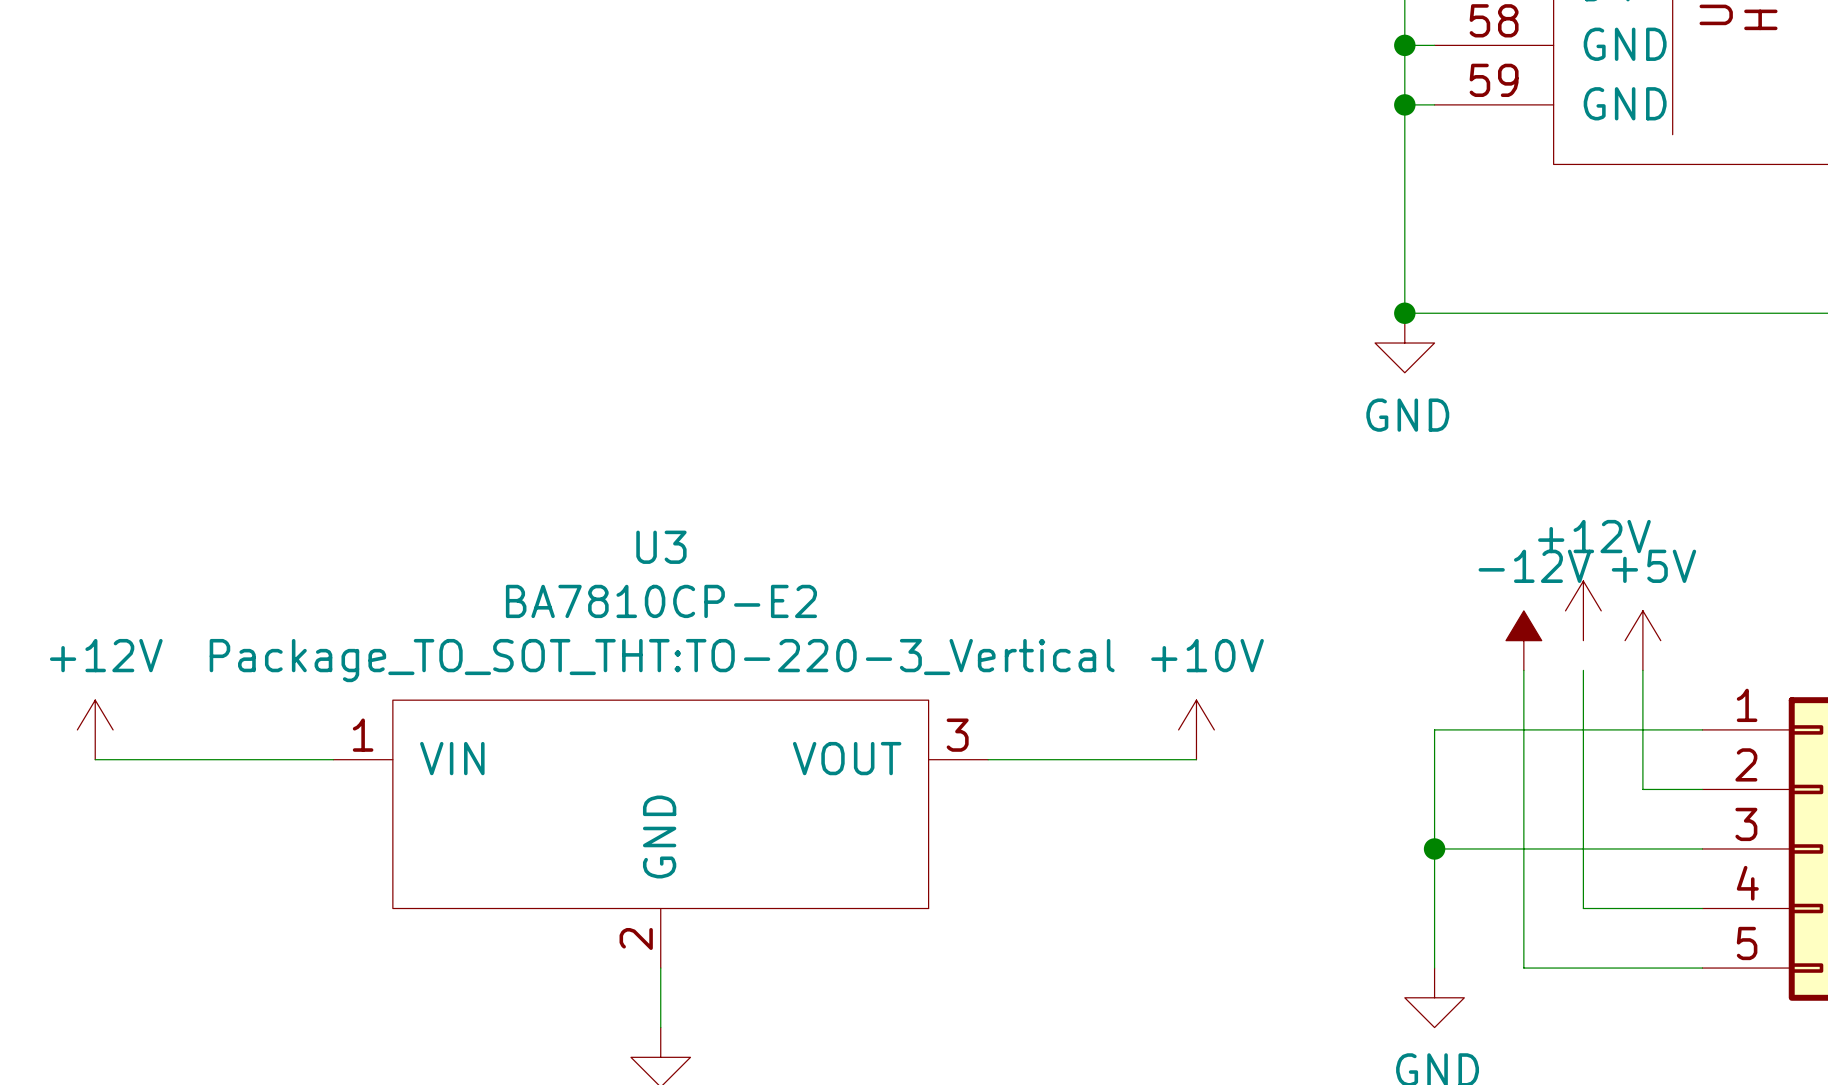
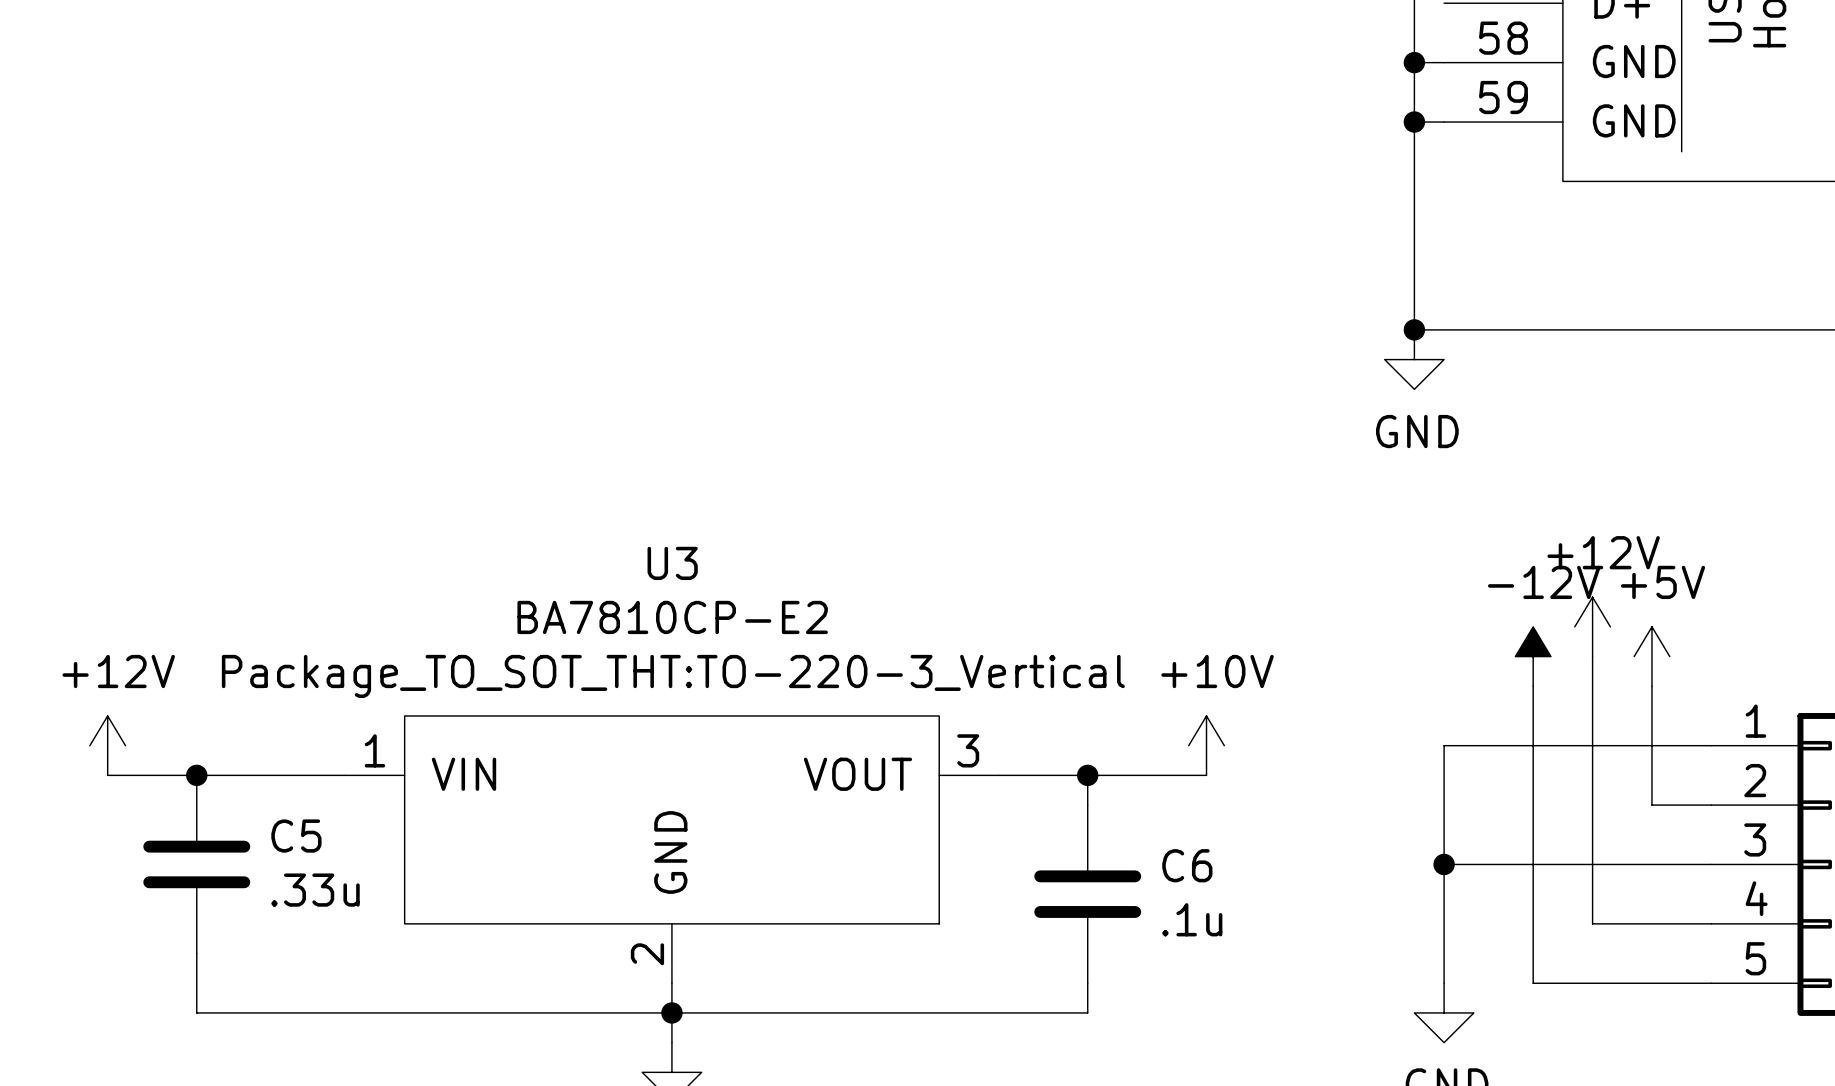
wire: none -> (1592, 656) (1592, 686)
junction: none -> (196, 775)
wire: none -> (1087, 775) (1087, 805)
junction: none -> (1087, 775)
C5: none -> .33u (196, 864)
C6: none -> .1u (1087, 894)
wire: none -> (196, 953) (196, 1012) (1087, 1012) (1087, 983)
junction: none -> (671, 1012)

